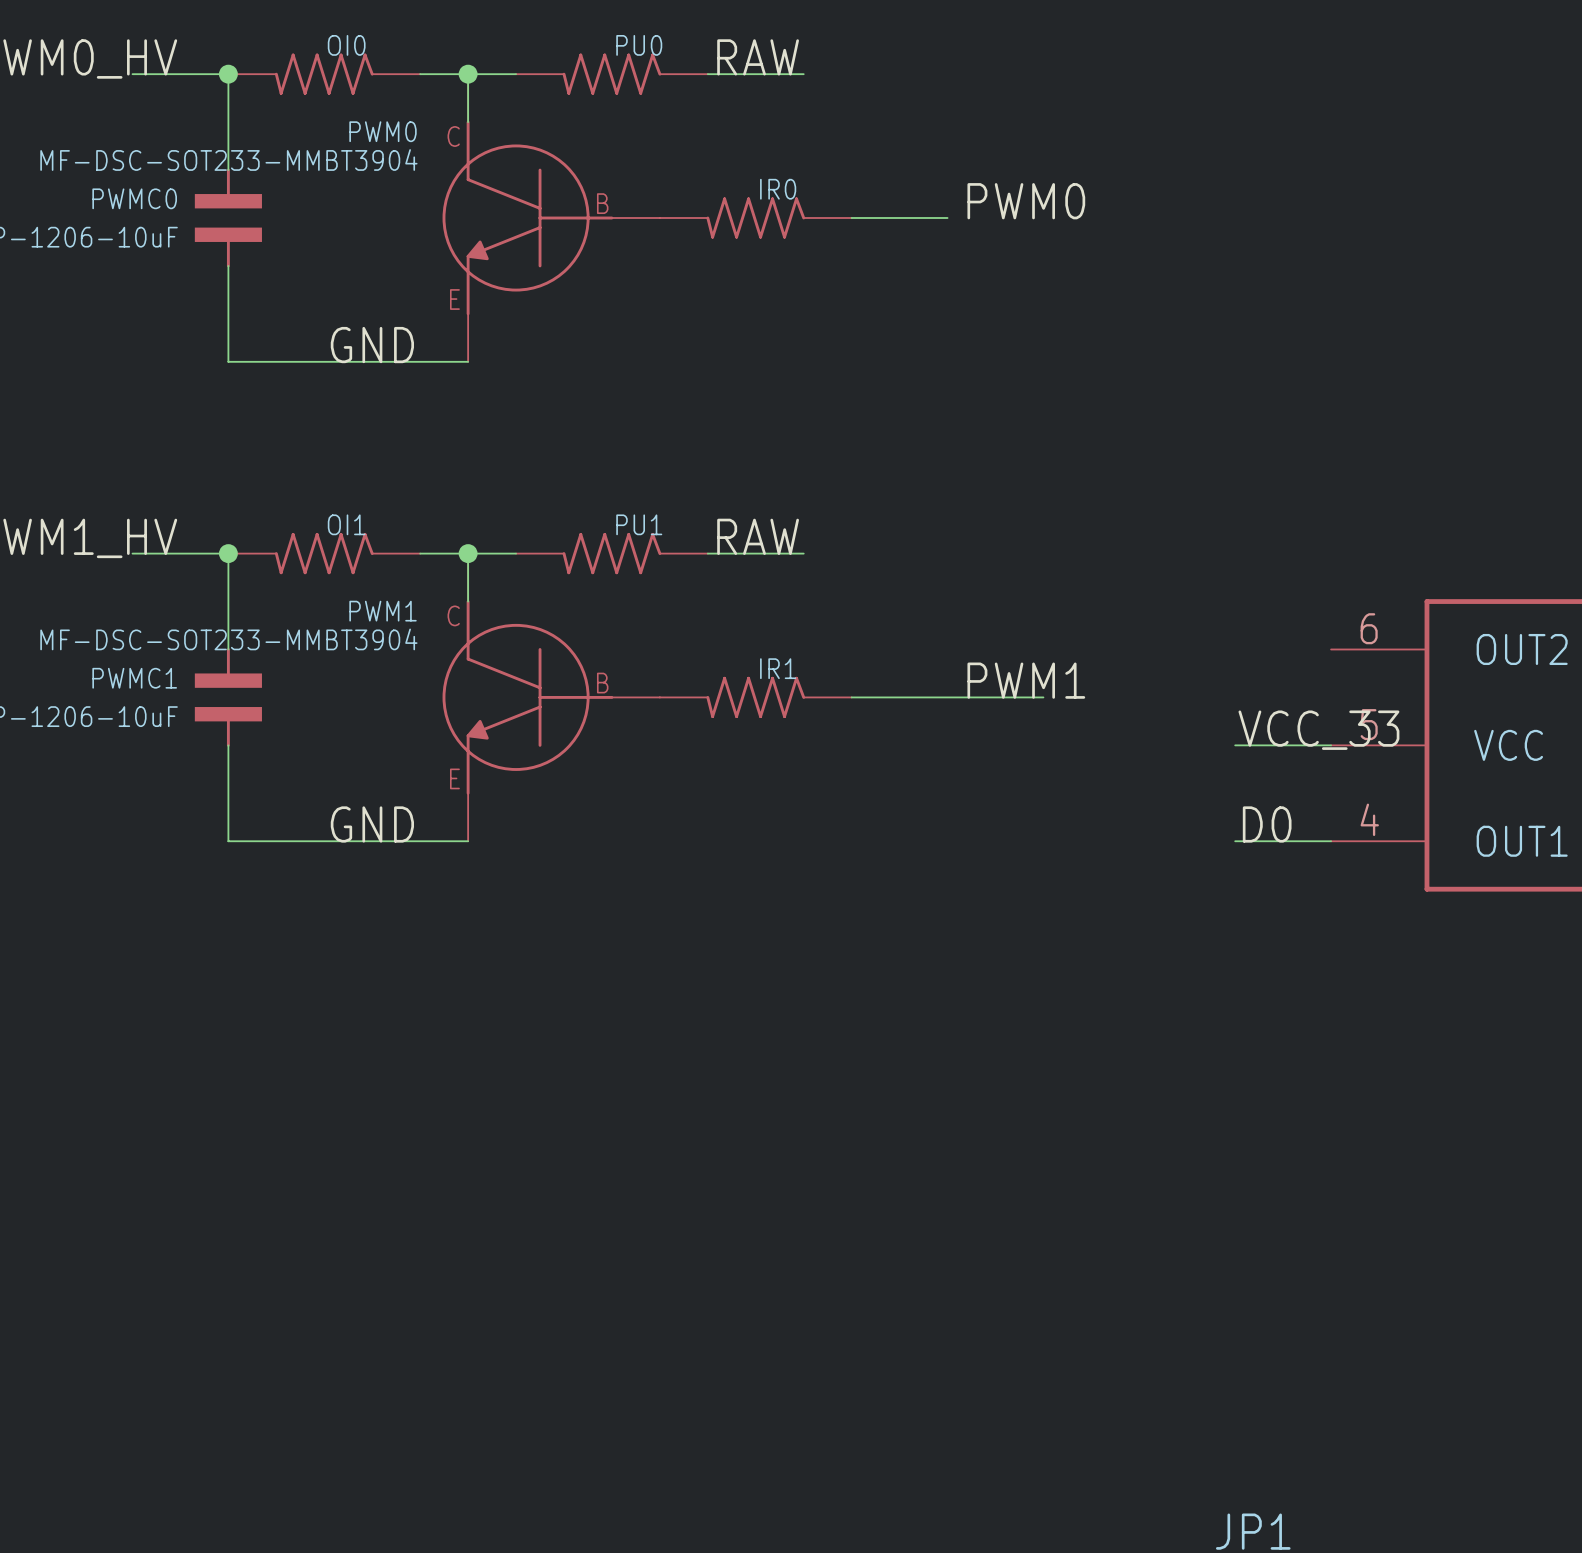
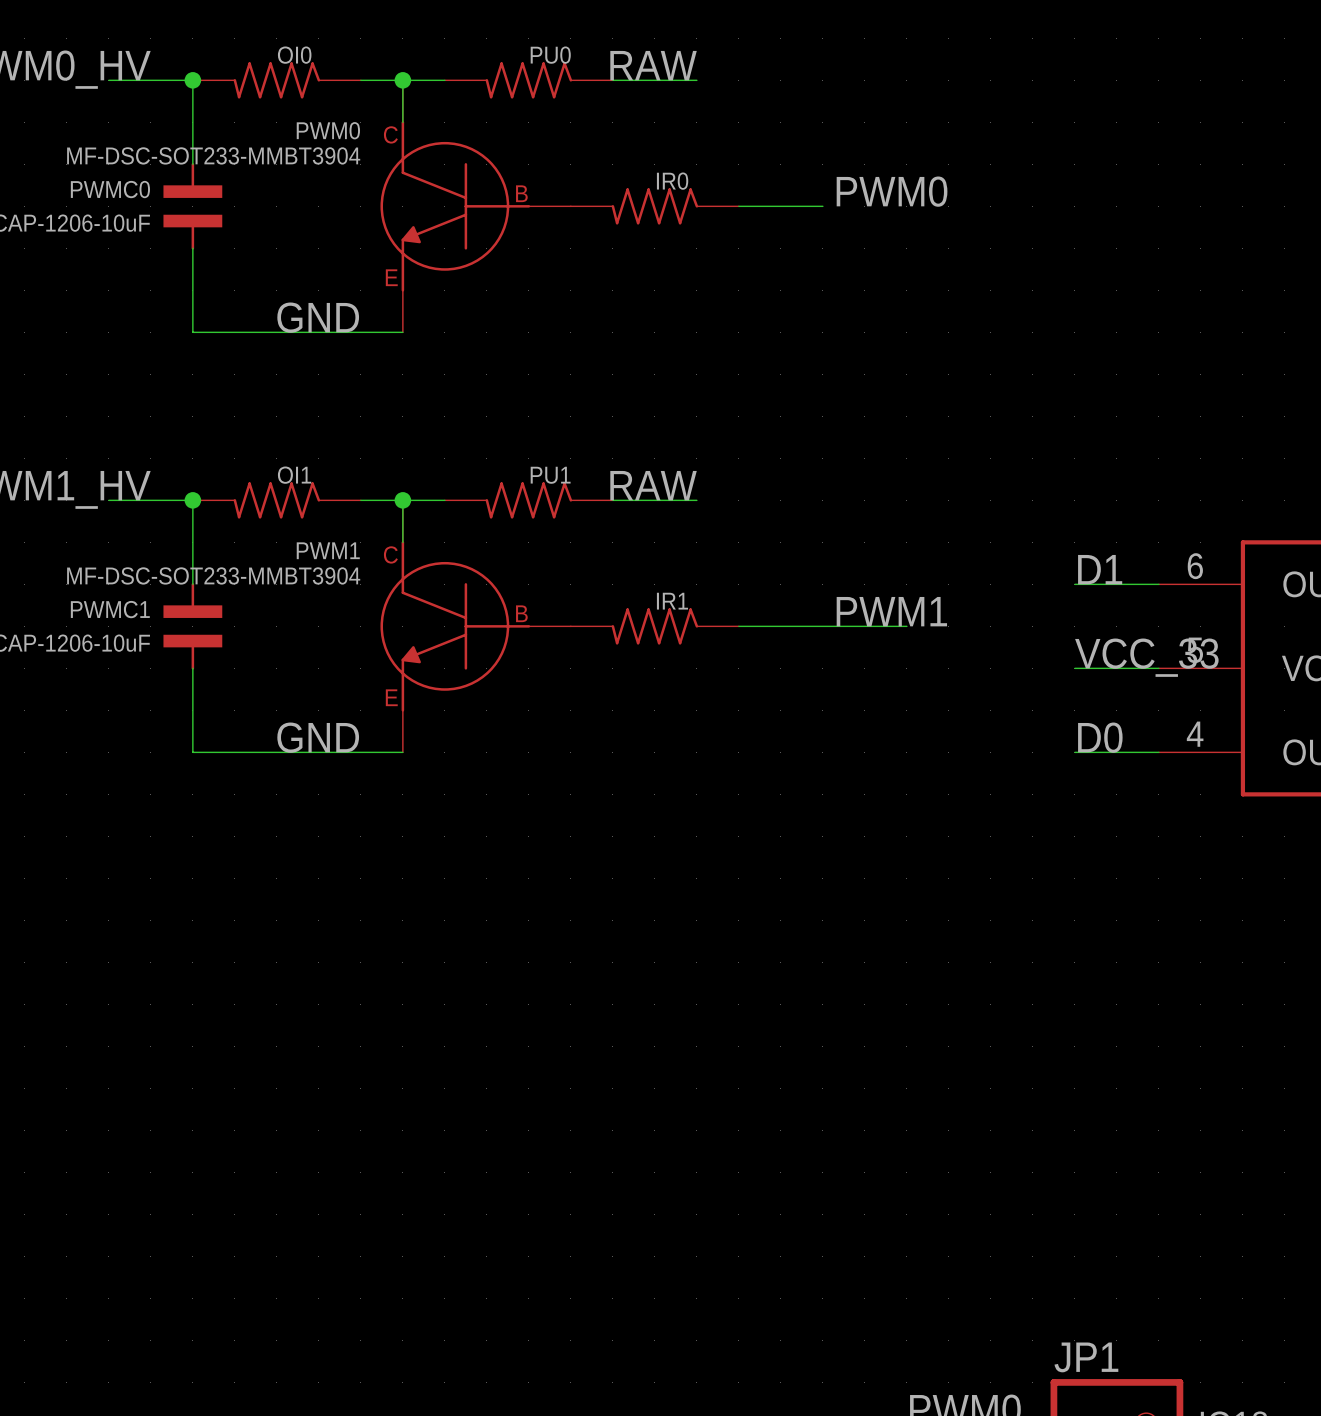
label: none -> D1 (1100, 569)
wire: none -> (1074, 584) (1158, 584)

